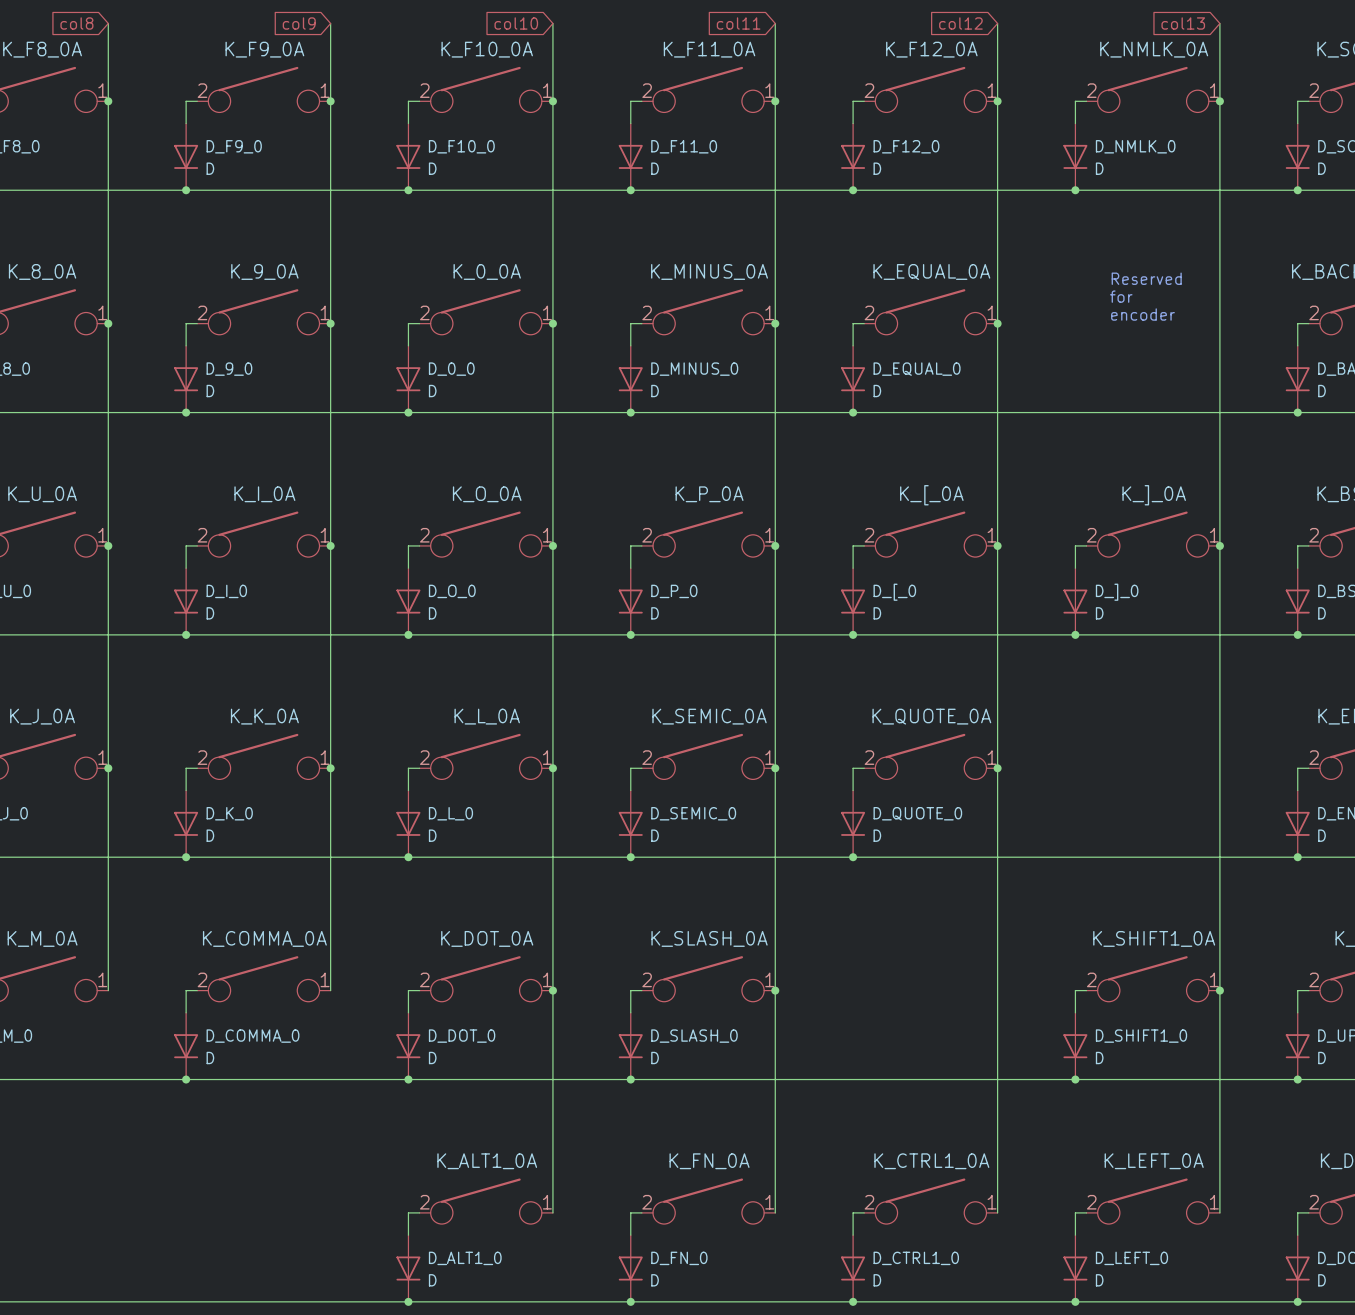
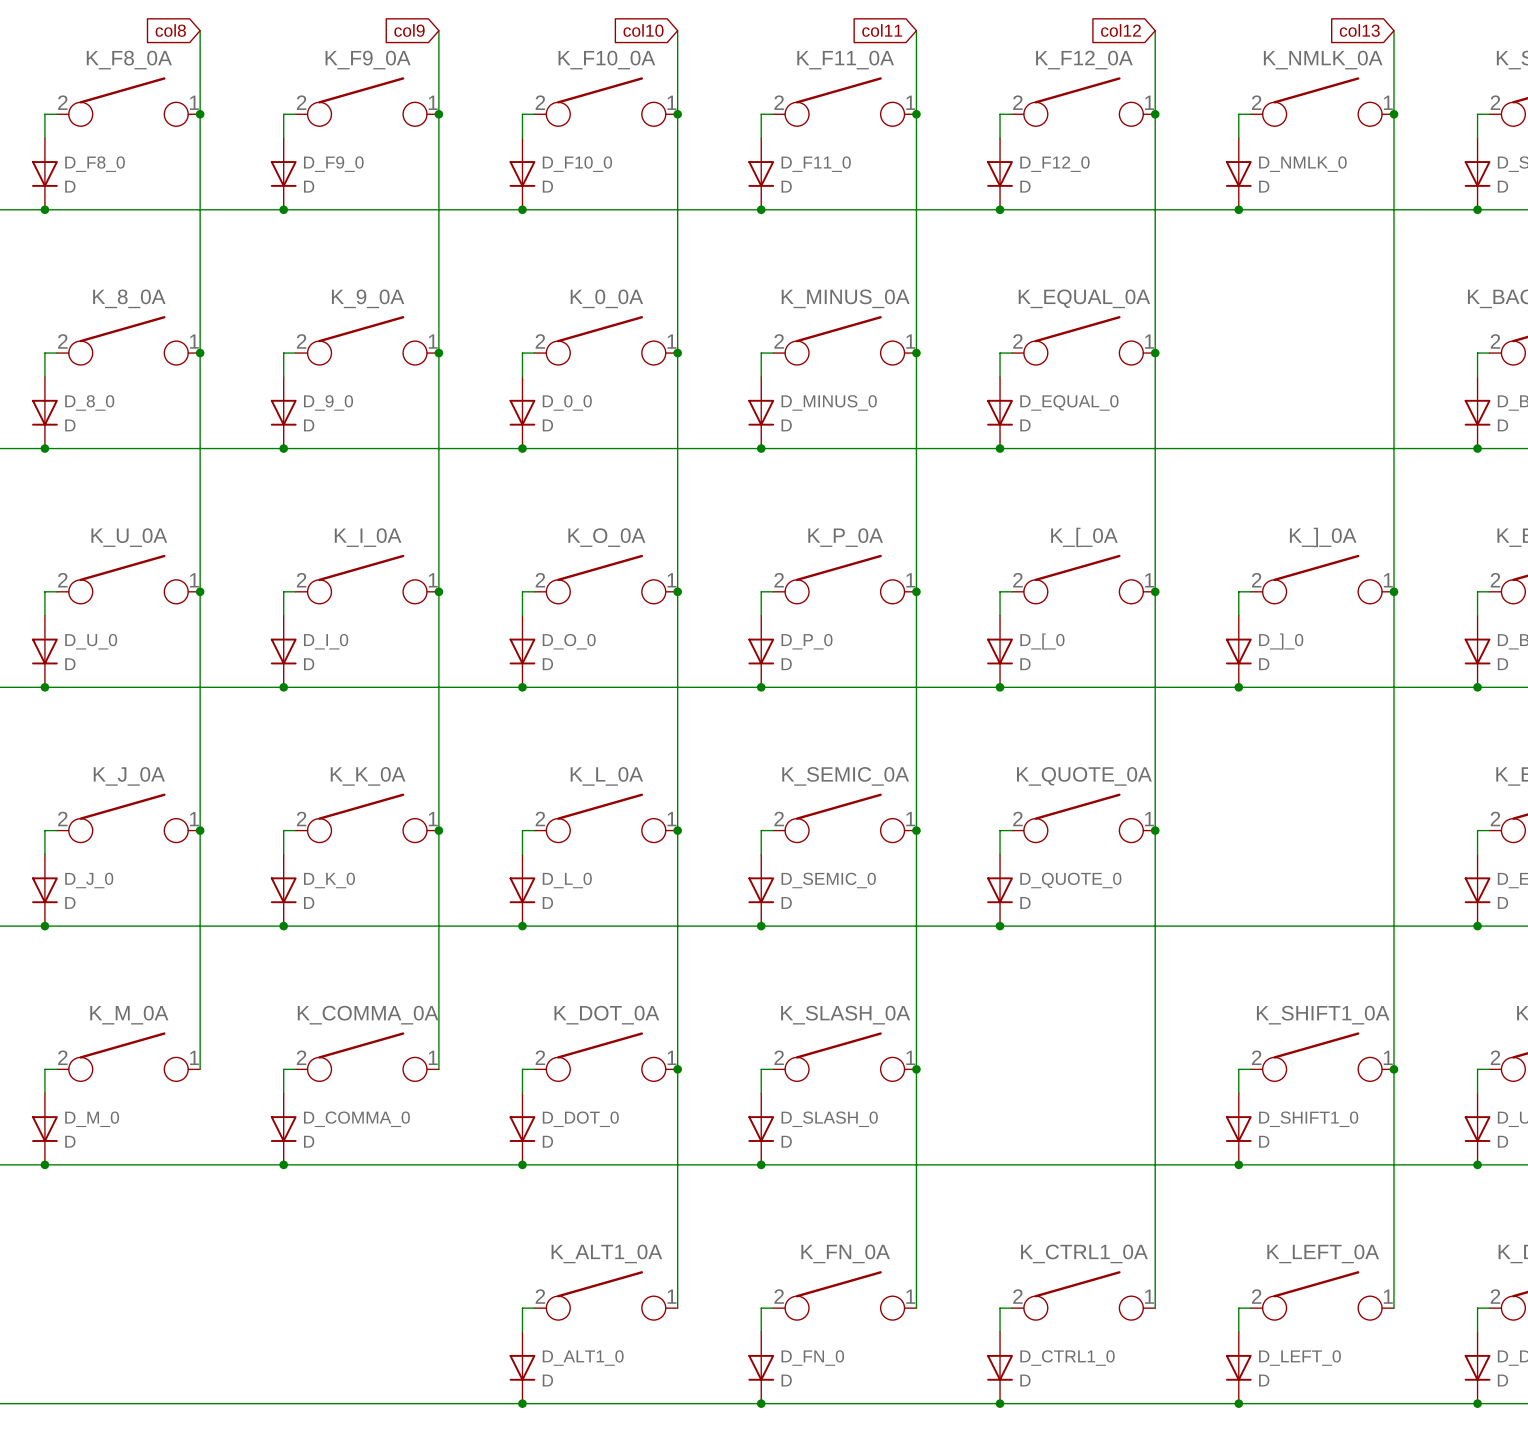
text: Reserved (1146, 278) -> none
text: for (1121, 296) -> none
text: encoder (1142, 314) -> none

